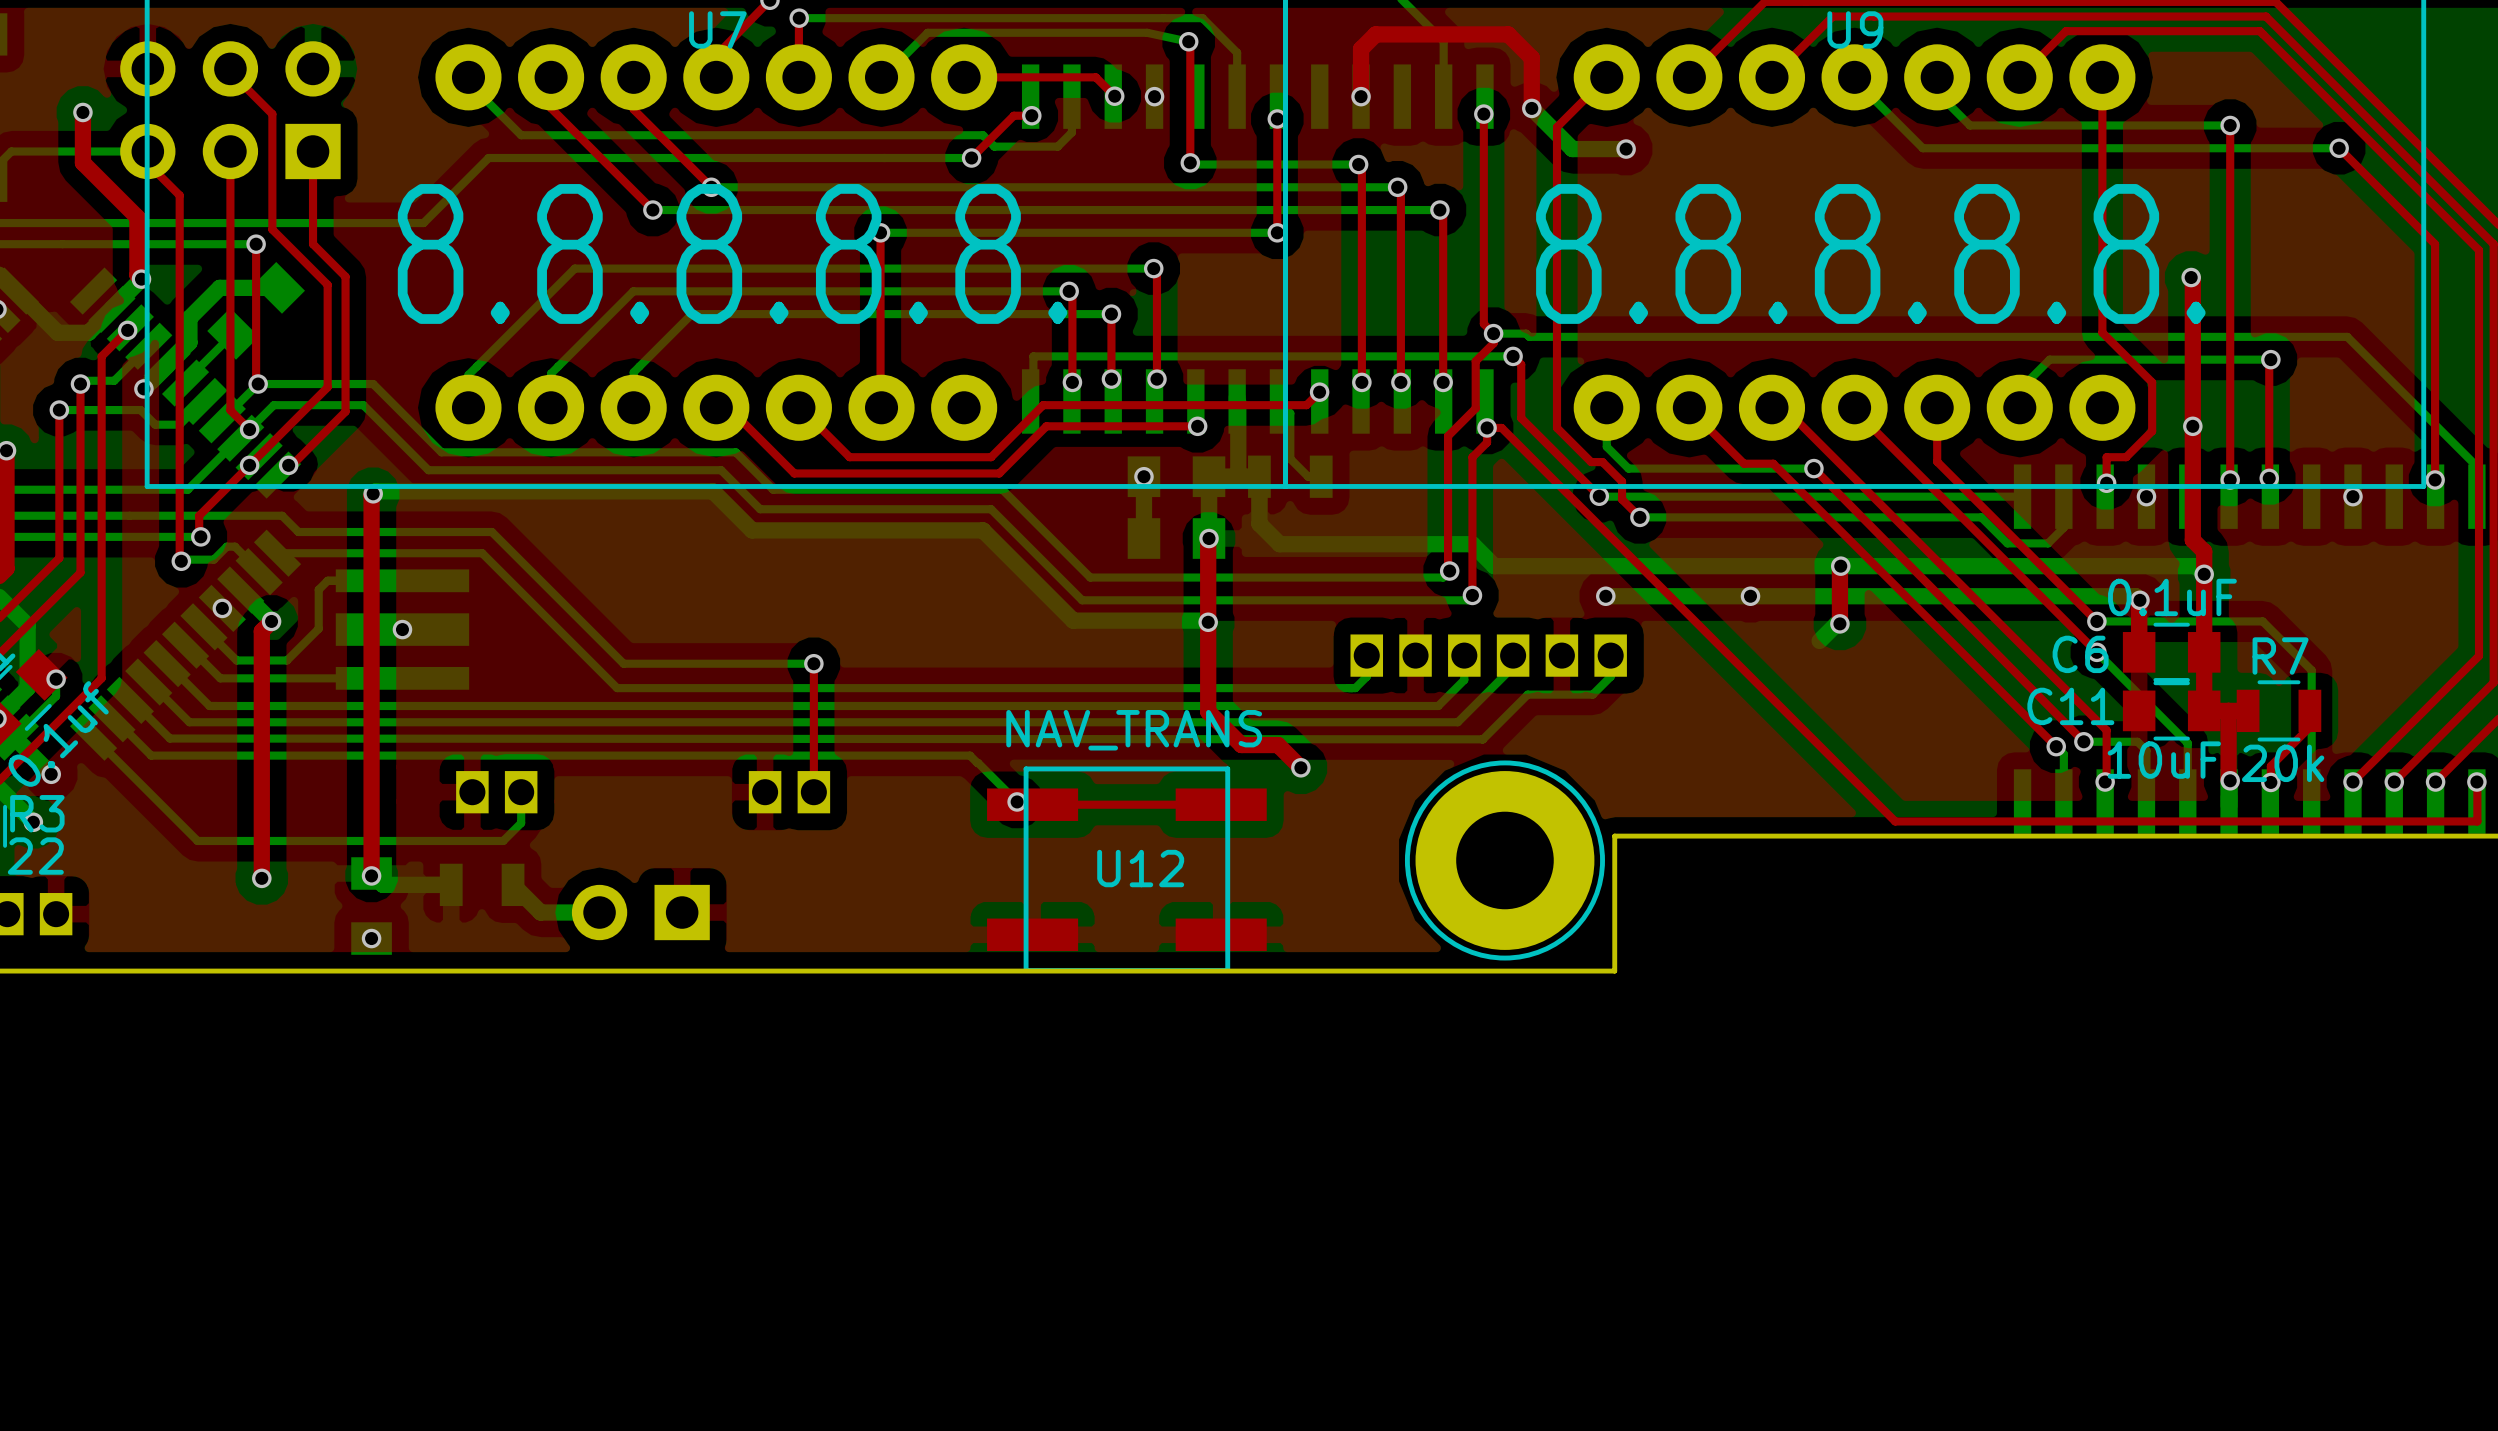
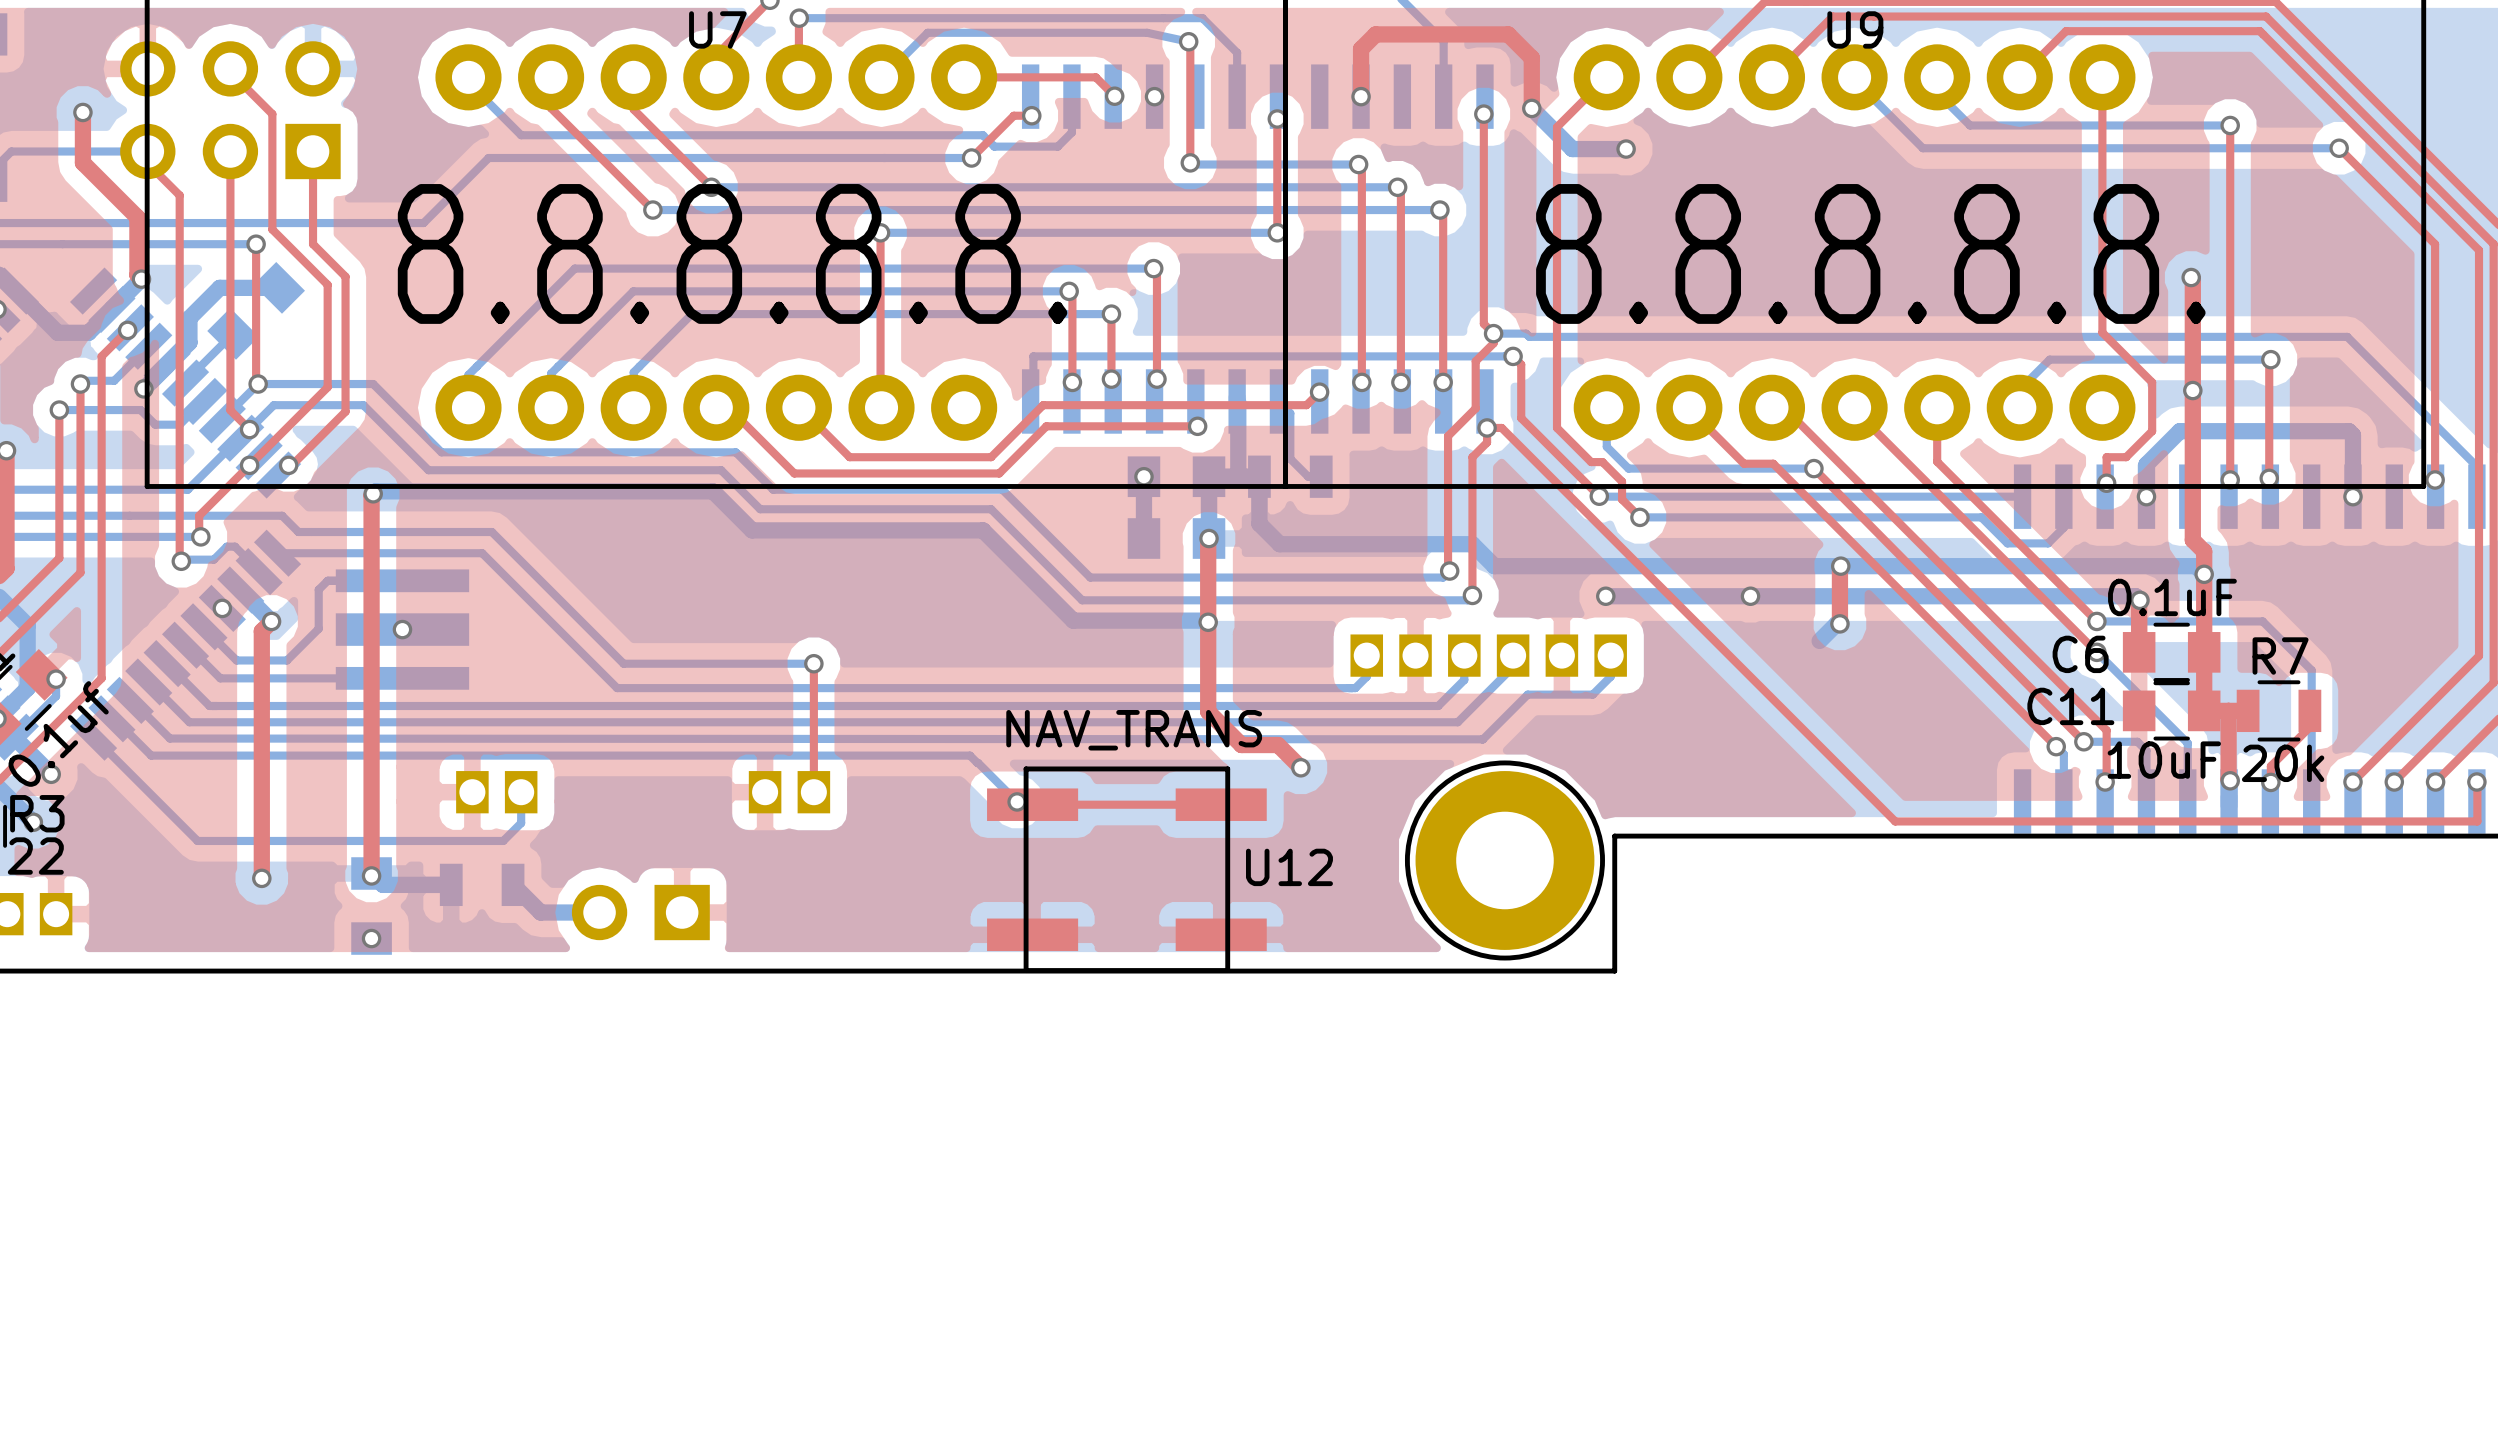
via position: (2192, 426) -> (2192, 390)
bottom track: none -> (2146, 496) (2146, 464) (2179, 431) (2348, 431) (2352, 435) (2352, 496)
U12 name position: U12 (1140, 868) -> U12 (1289, 867)

